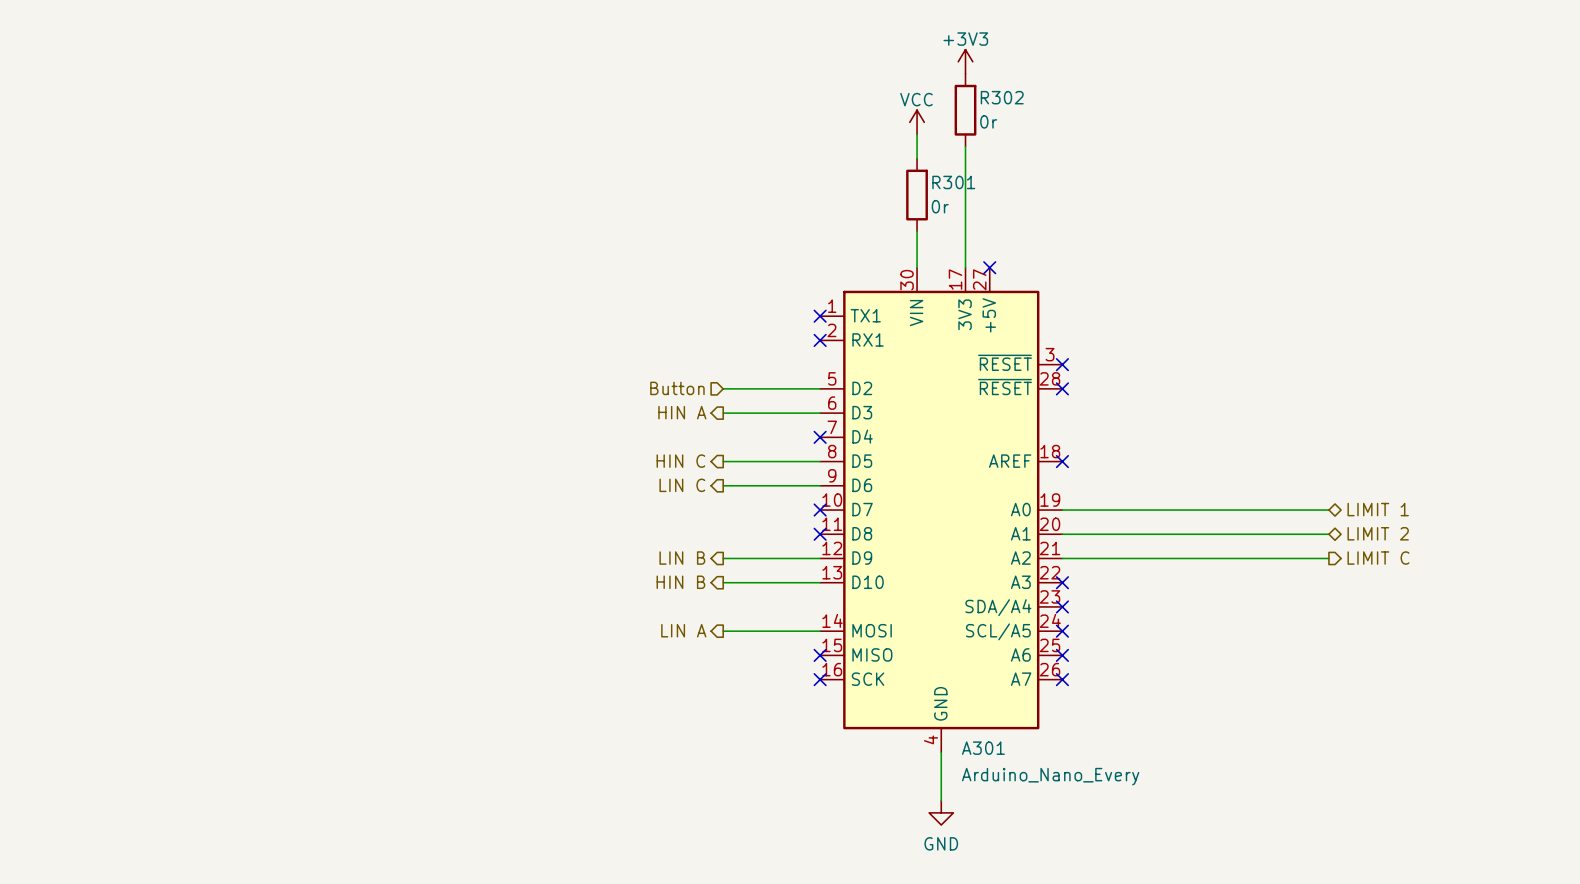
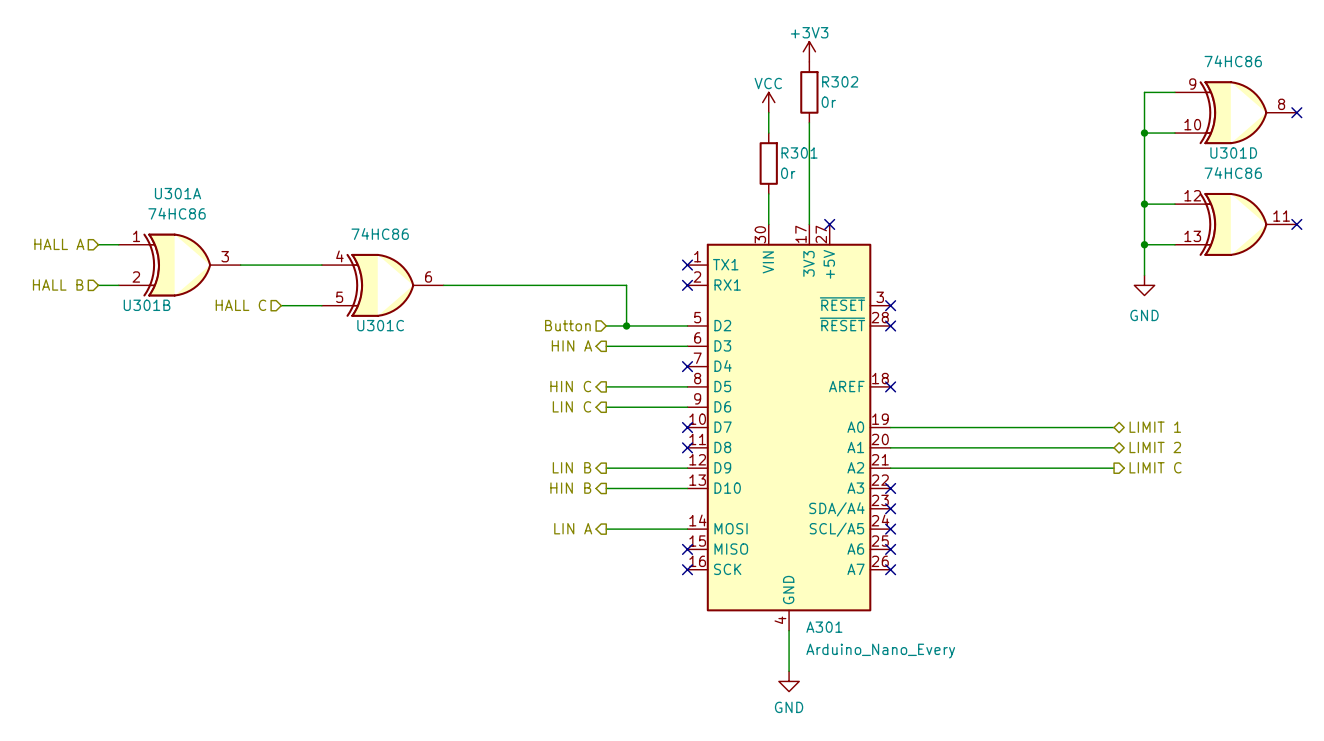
wire: none -> (1174, 92) (1144, 92) (1144, 275)
U301C: none -> 74HC86 (1235, 112)
no-connect mark: none -> (1296, 112)
wire: none -> (1144, 133) (1174, 133)
junction: none -> (1144, 133)
wire: none -> (1144, 204) (1174, 204)
junction: none -> (1144, 204)
U301D: none -> 74HC86 (1235, 224)
no-connect mark: none -> (1296, 224)
hierarchical label: none -> HALL A (59, 244)
wire: none -> (98, 244) (118, 244)
wire: none -> (1144, 244) (1174, 244)
junction: none -> (1144, 244)
U301A: none -> 74HC86 (179, 265)
wire: none -> (240, 265) (321, 265)
hierarchical label: none -> HALL B (58, 284)
wire: none -> (98, 285) (118, 285)
U301B: none -> 74HC86 (382, 285)
wire: none -> (443, 285) (626, 285) (626, 325)
power symbol: none -> GND (1144, 285)
hierarchical label: none -> HALL C (240, 305)
wire: none -> (281, 305) (321, 305)
junction: none -> (626, 325)

